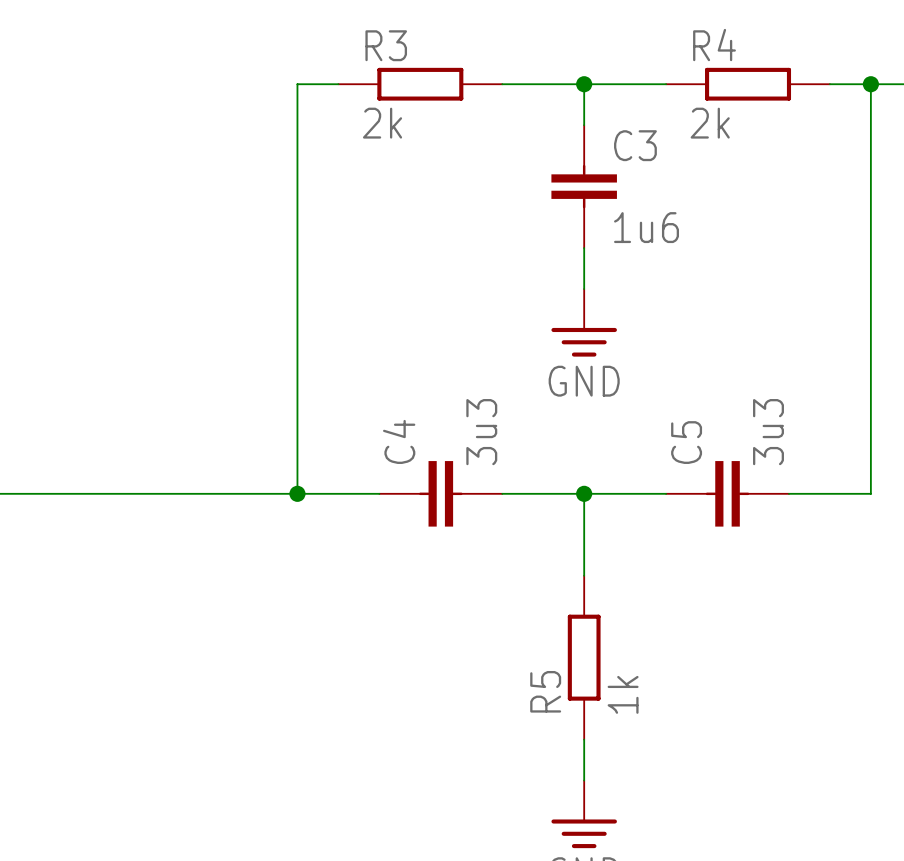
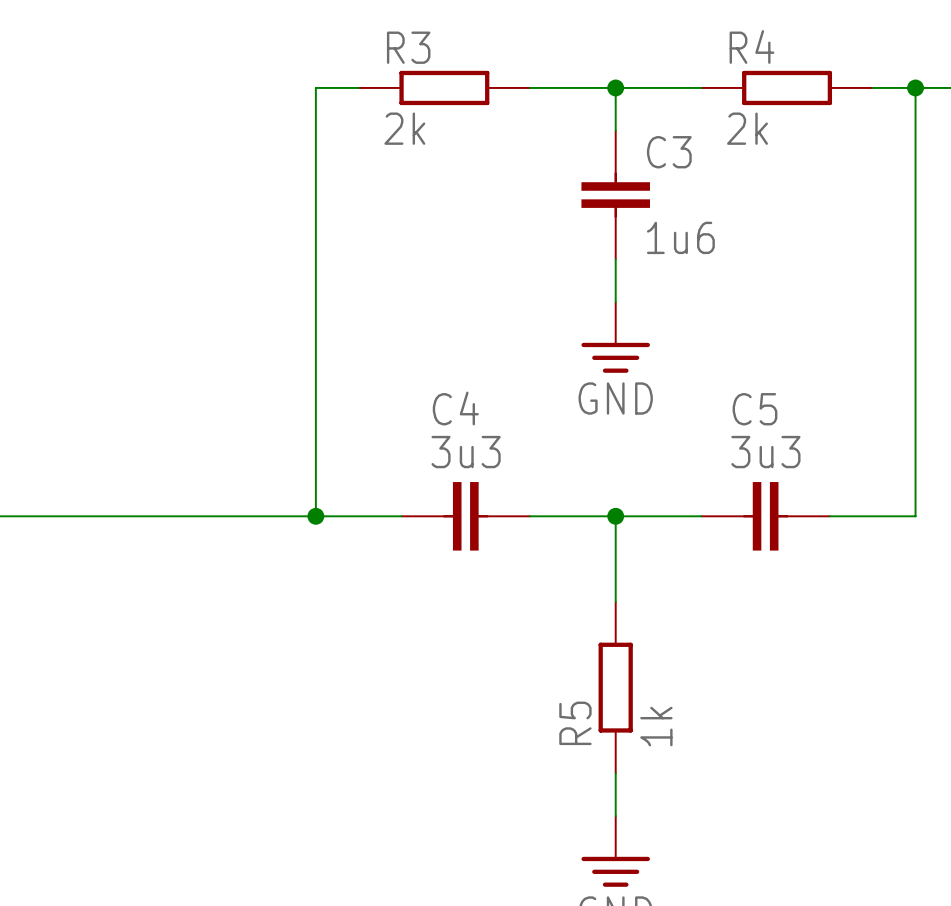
C4 value rotation: 0° (481, 432) -> 90° clockwise (466, 452)
C5 value rotation: 0° (768, 432) -> 90° clockwise (765, 452)
C4 name rotation: 0° (399, 441) -> 90° clockwise (455, 408)
C5 name rotation: 0° (686, 442) -> 90° clockwise (754, 409)

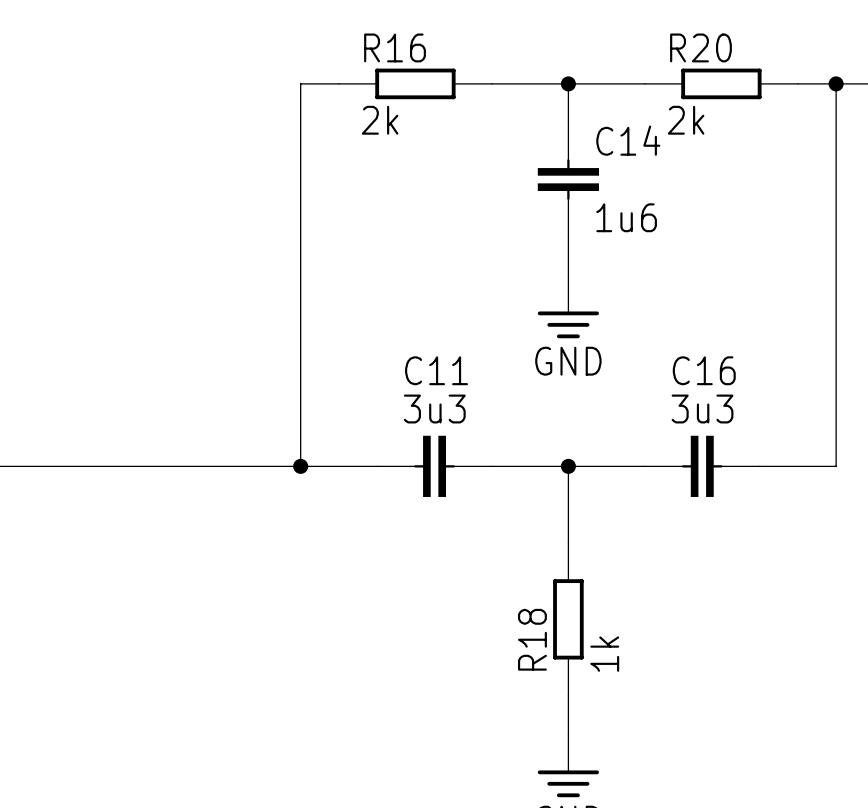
R3 name: R3 (408, 47) -> R16 (395, 47)
R4 name: R4 (751, 47) -> R20 (701, 47)
C3 name: C3 (669, 152) -> C14 (628, 140)
C4 name: C4 (455, 408) -> C11 (436, 370)
C5 name: C5 (754, 409) -> C16 (704, 370)
R5 name: R5 (575, 723) -> R18 (532, 639)

